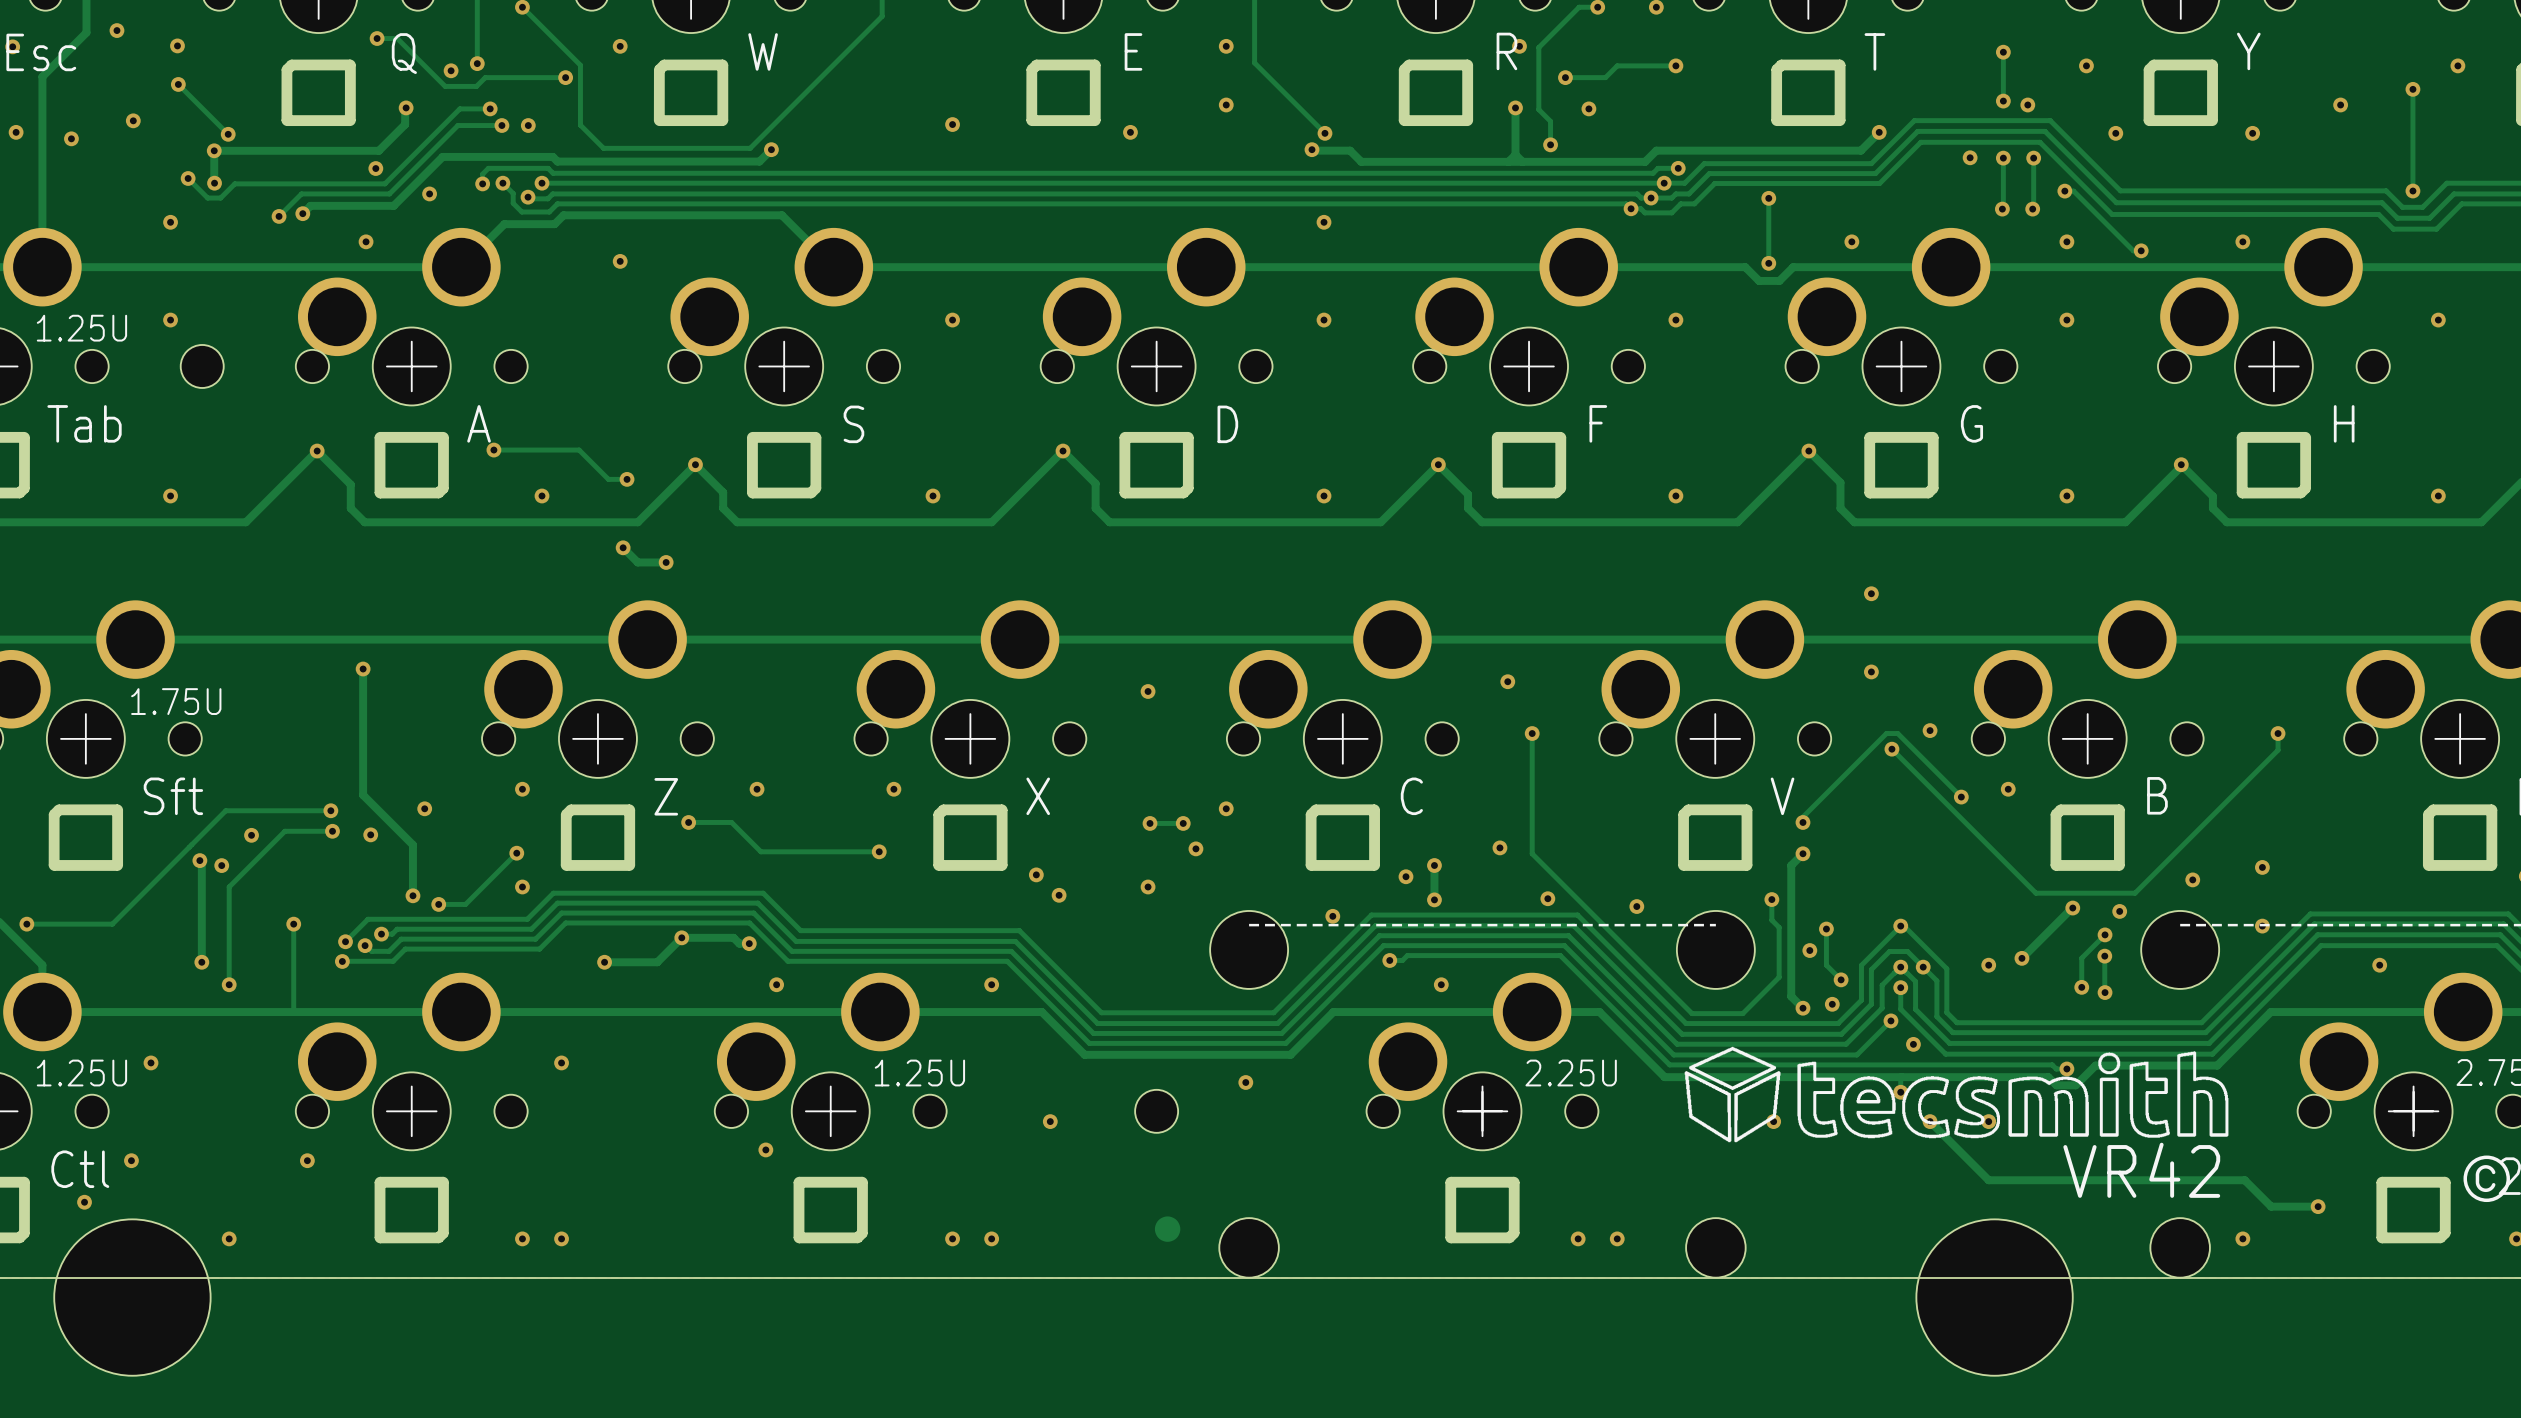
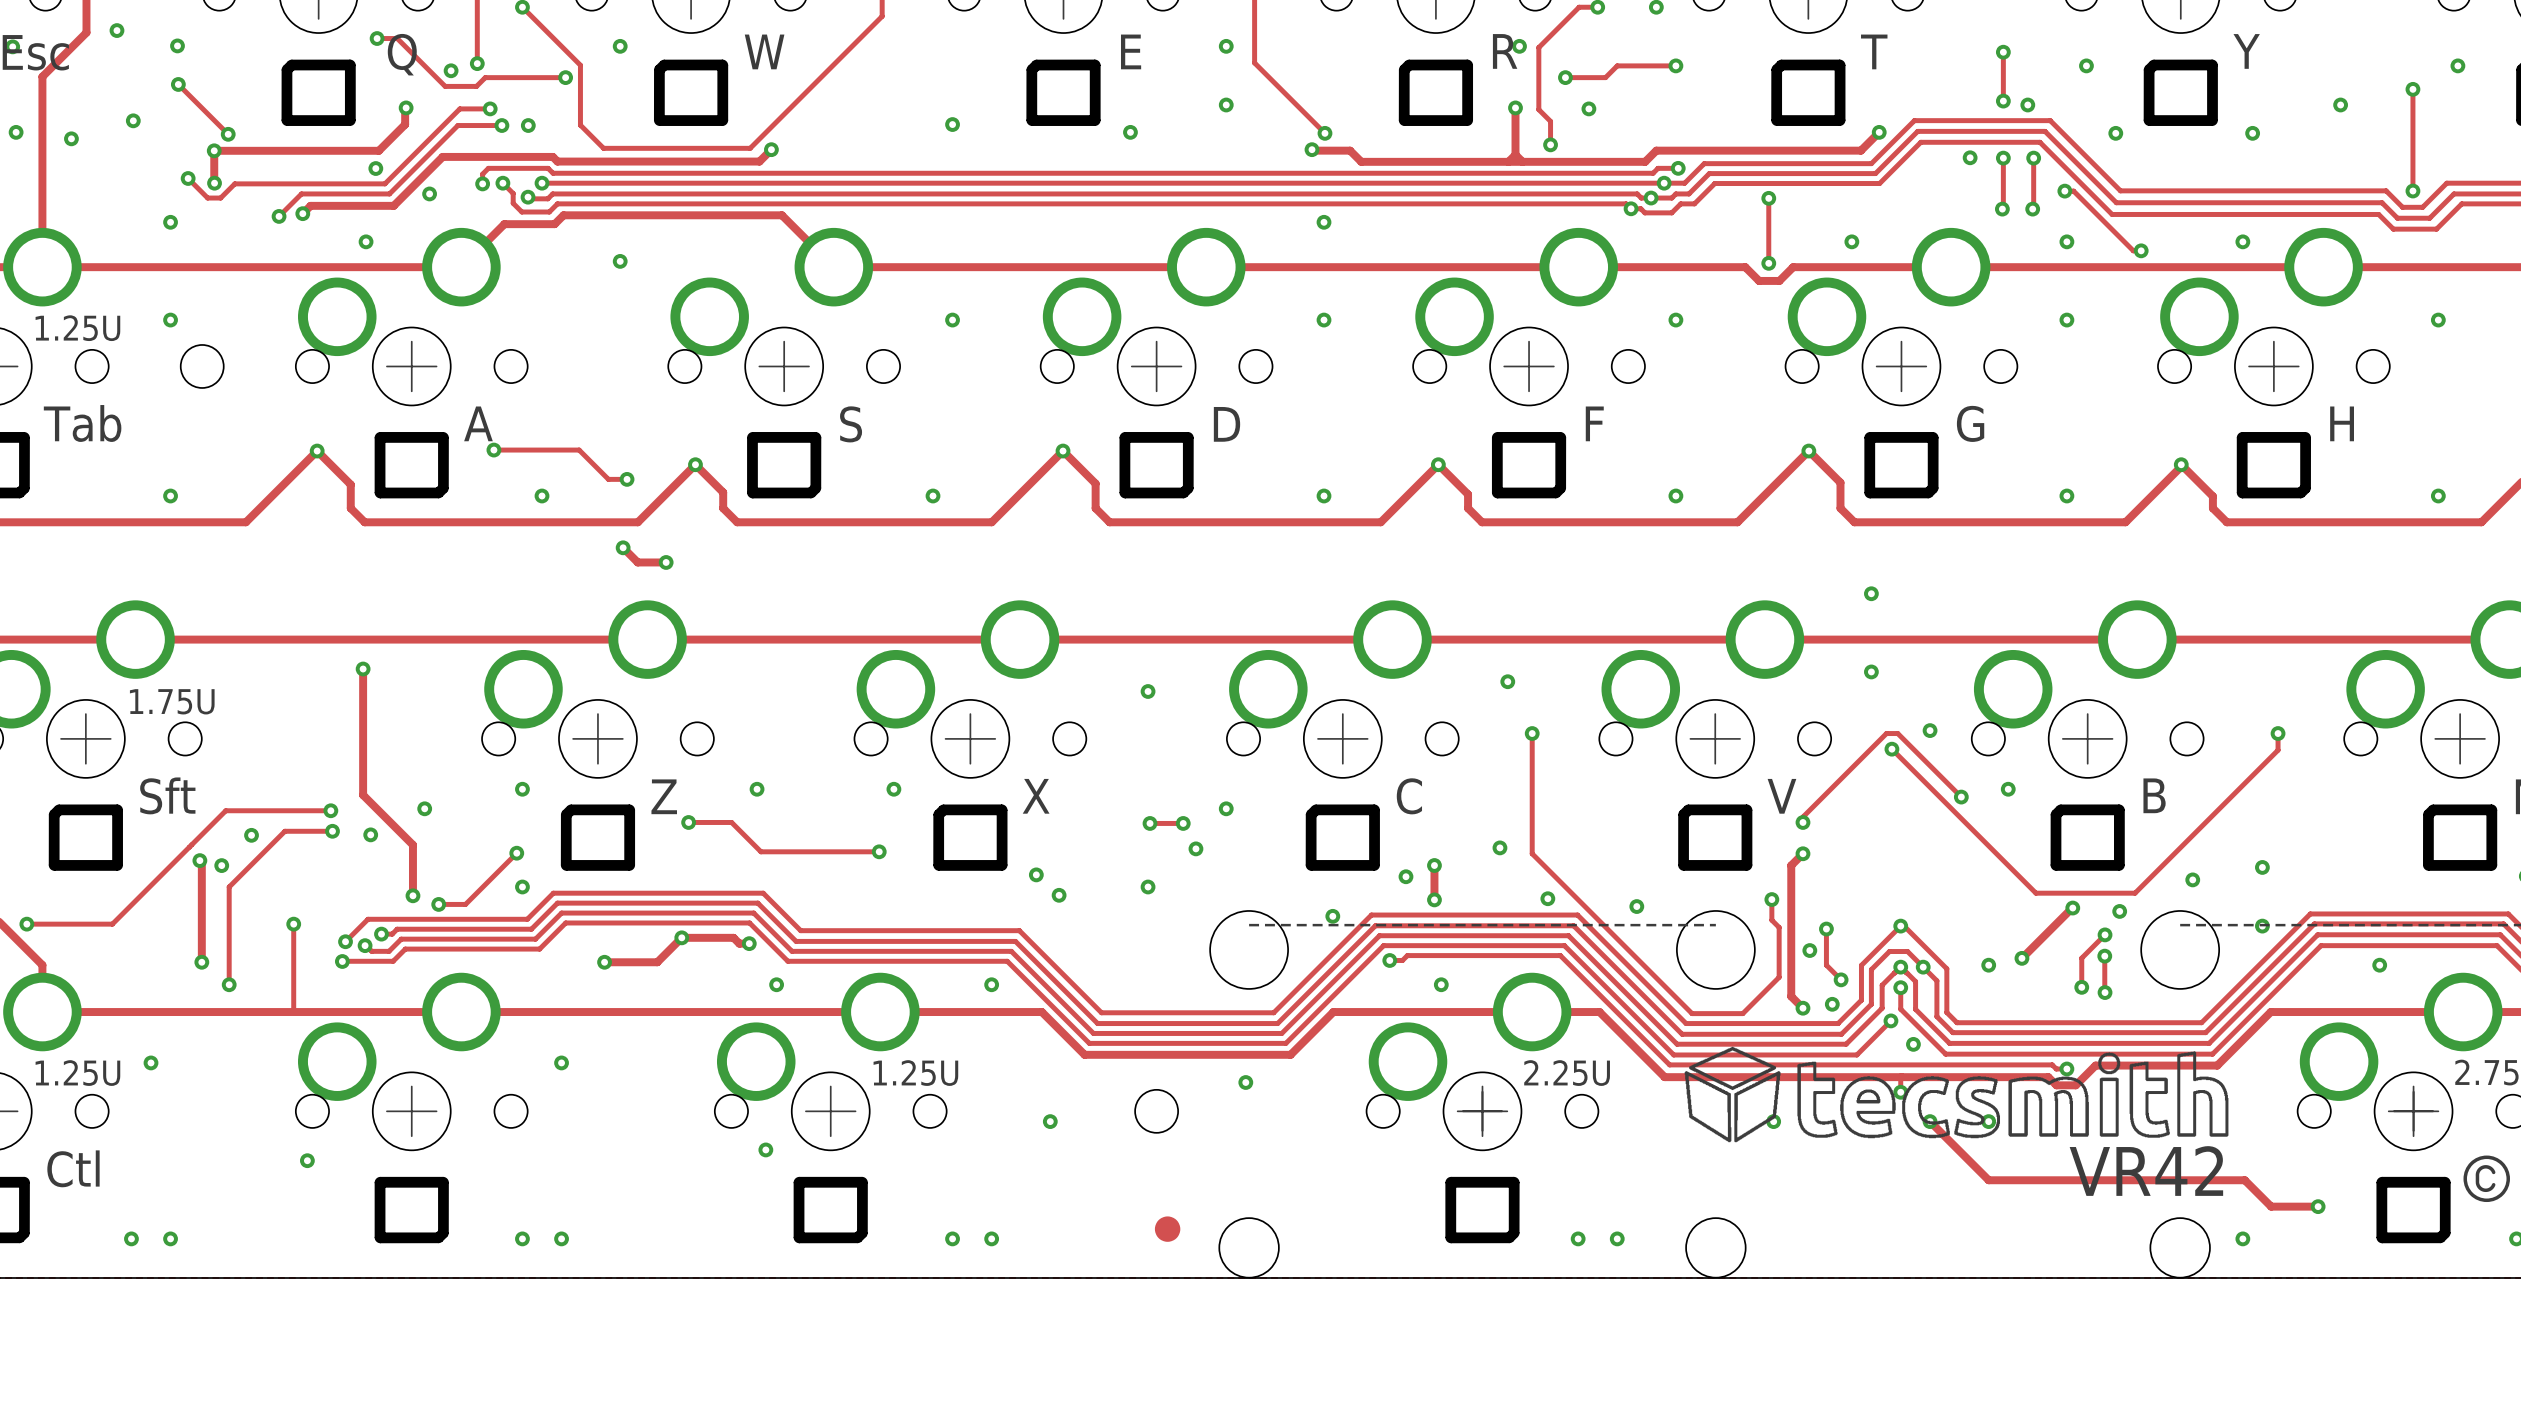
via: (131, 1160) -> none
via: (84, 1202) -> none
via: none -> (131, 1238)
via: none -> (170, 1238)
via: (229, 1238) -> none
hole: (132, 1297) -> none
hole: (1994, 1297) -> none

